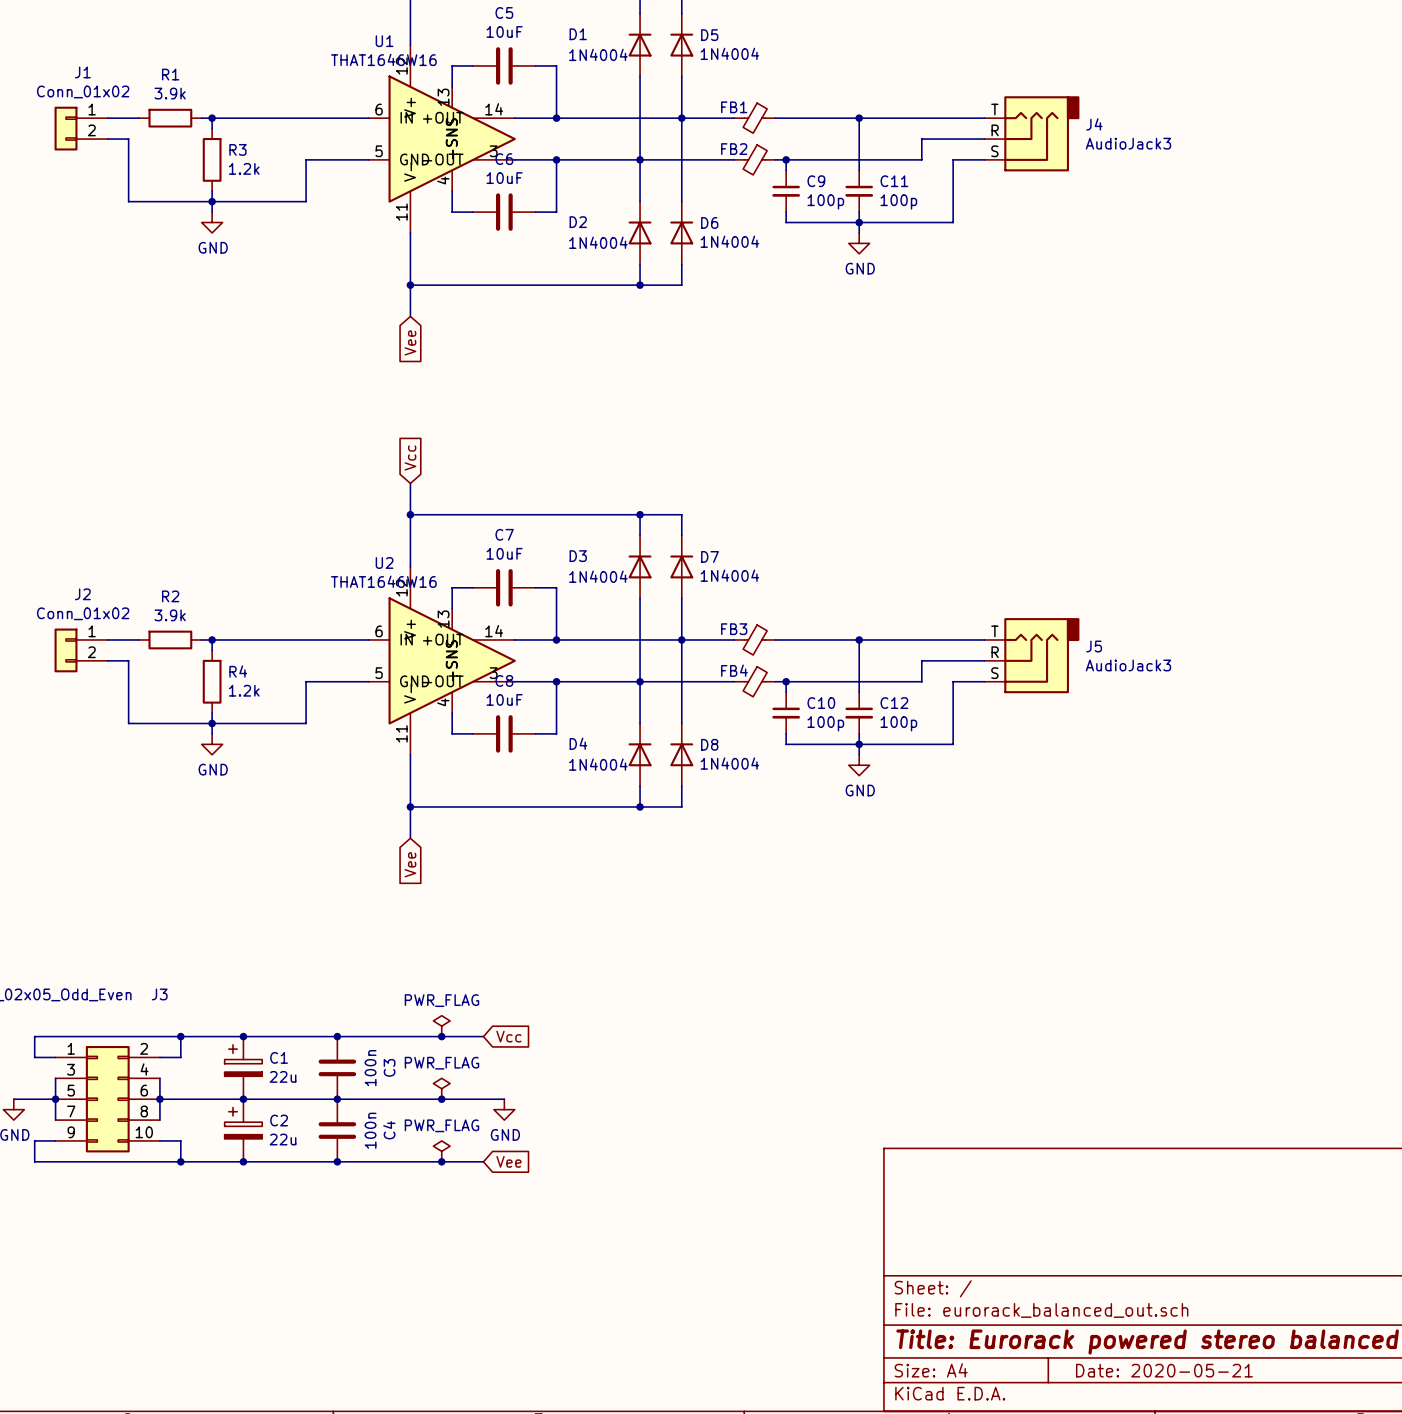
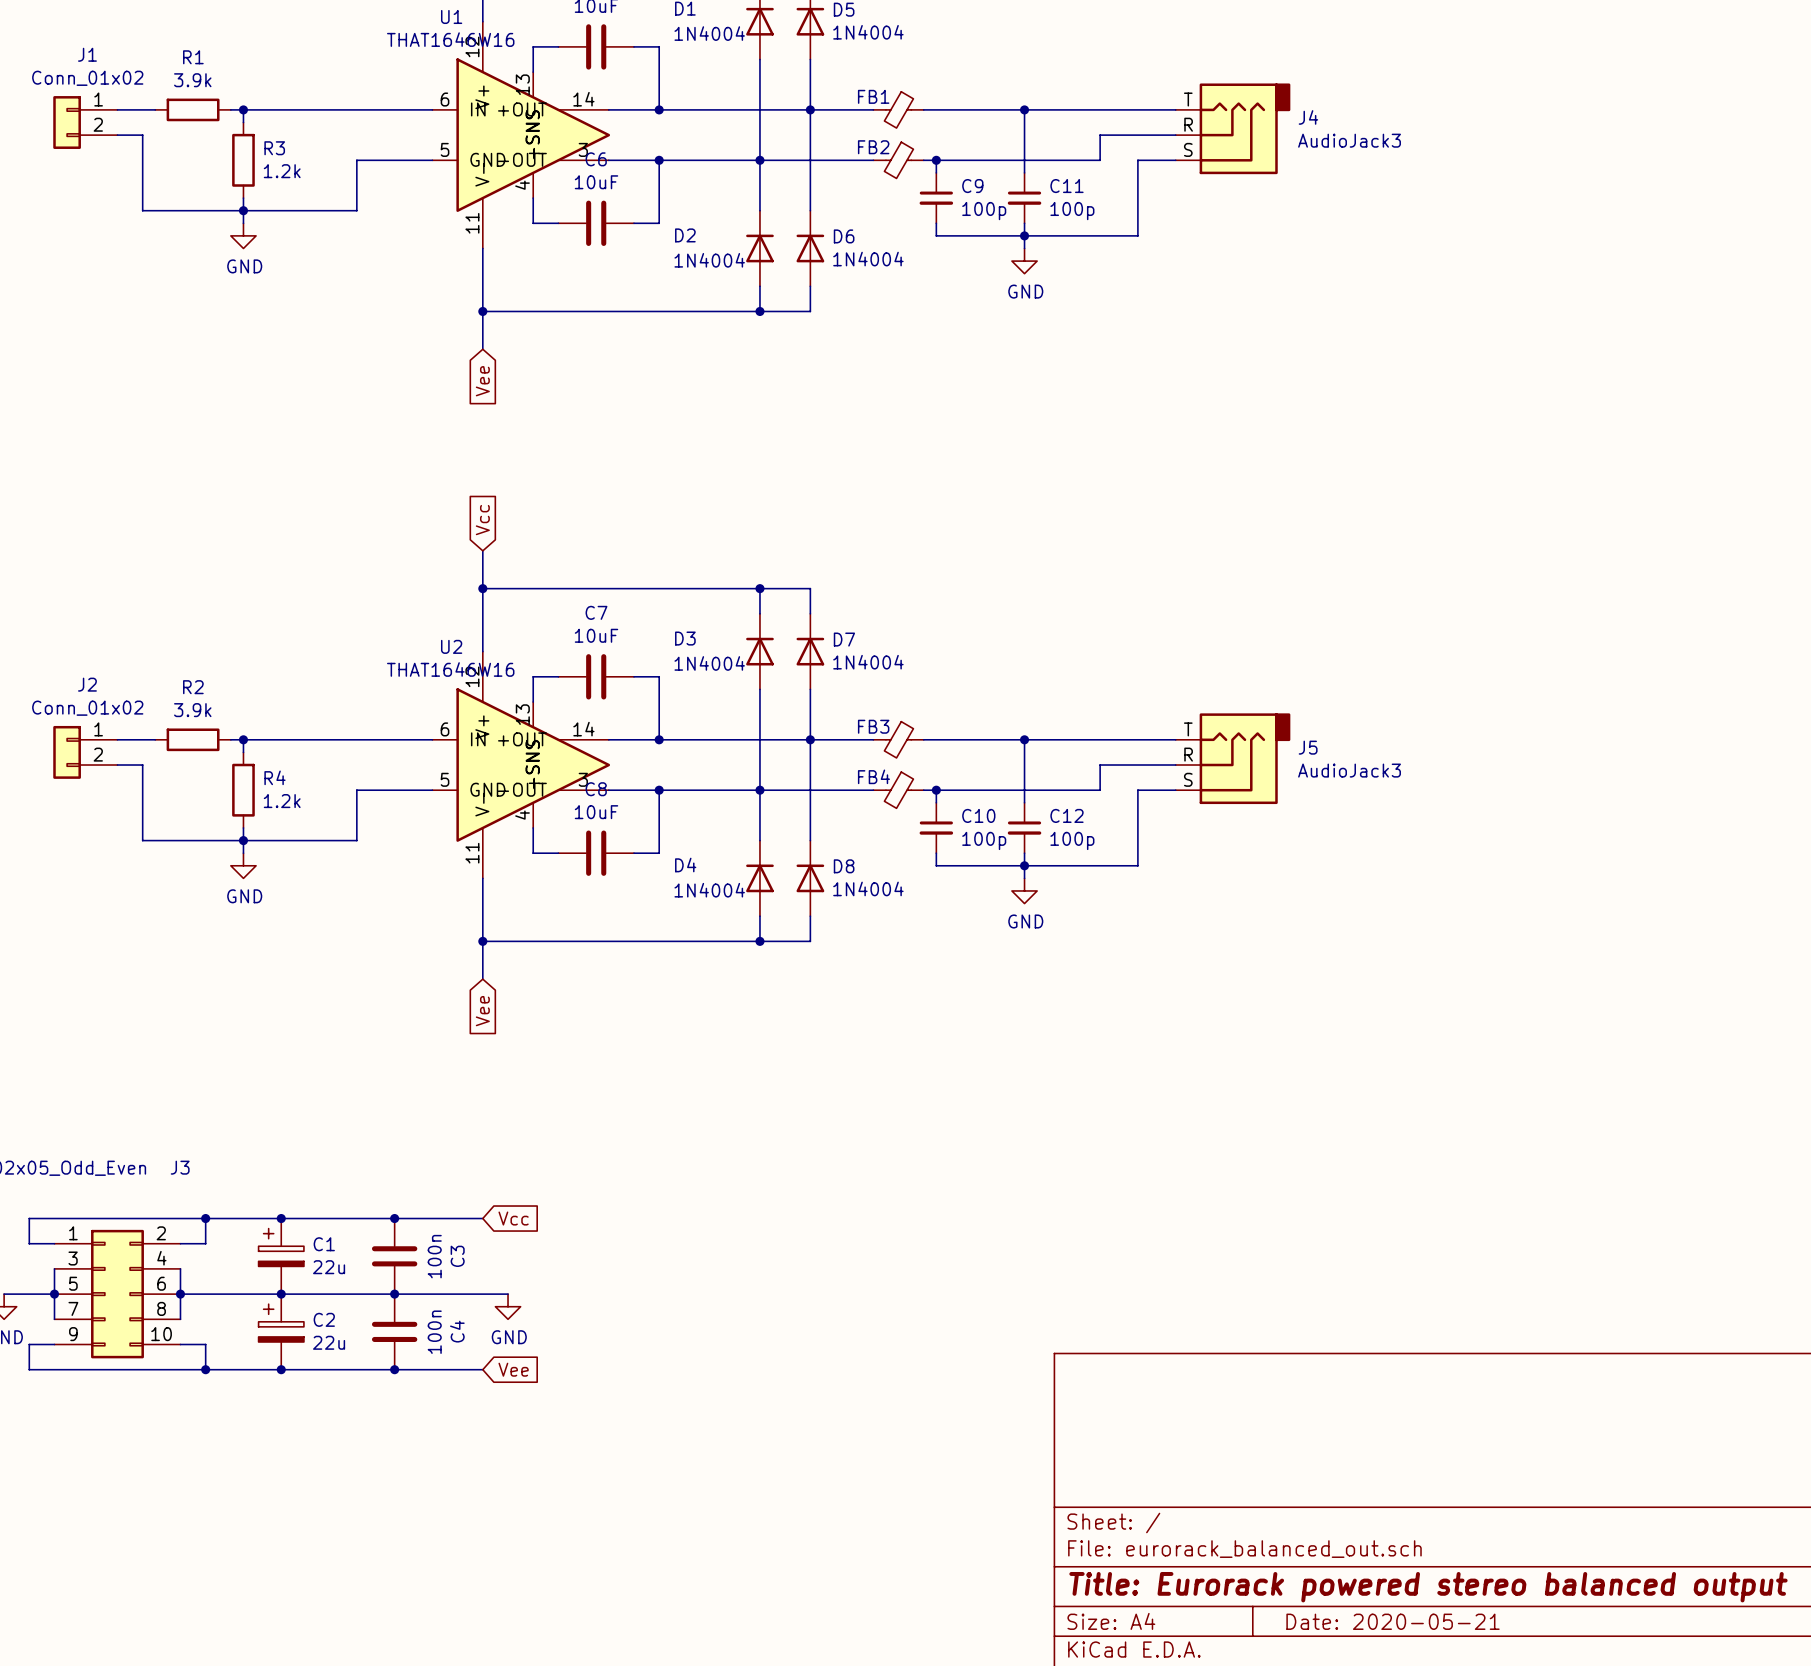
power symbol: PWR_FLAG (441, 1026) -> none
wire: (410, 1036) (483, 1036) -> none
junction: (441, 1036) -> none
global label position: Vcc (508, 1036) -> Vcc (513, 1218)
power symbol: PWR_FLAG (441, 1088) -> none
wire: (431, 1099) (504, 1099) -> none
junction: (441, 1099) -> none
power symbol position: GND (504, 1109) -> GND (508, 1306)
power symbol: PWR_FLAG (441, 1151) -> none
wire: (410, 1161) (483, 1161) -> none
junction: (441, 1161) -> none
global label position: Vee (508, 1161) -> Vee (513, 1369)

